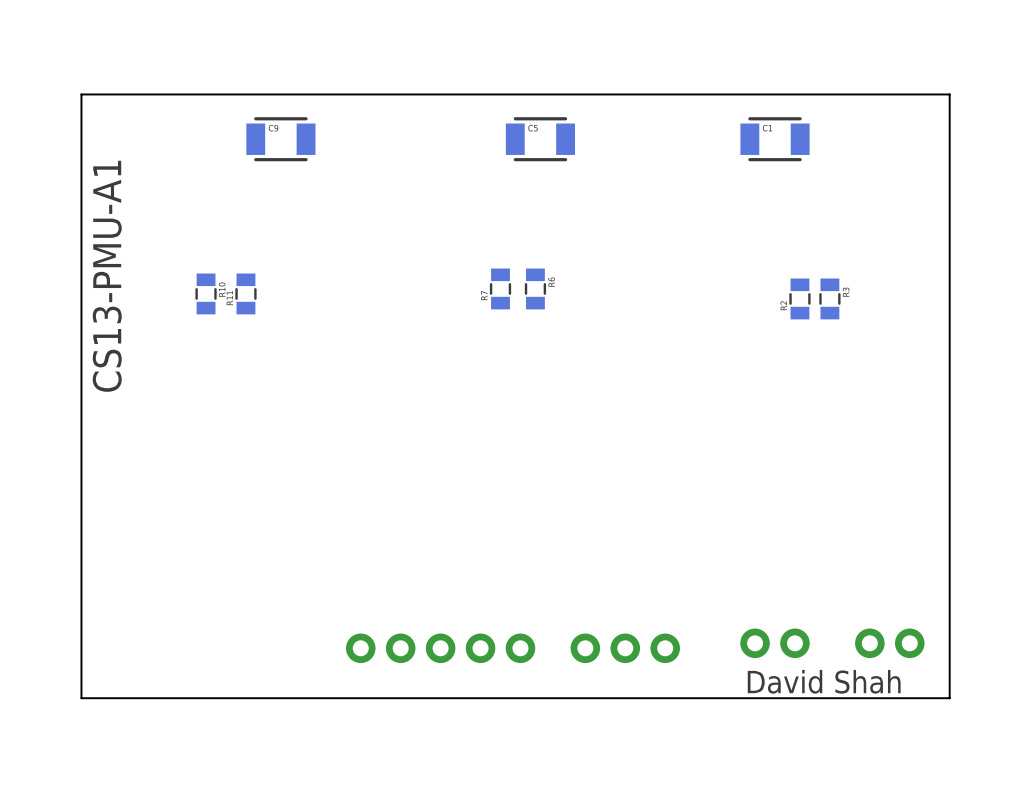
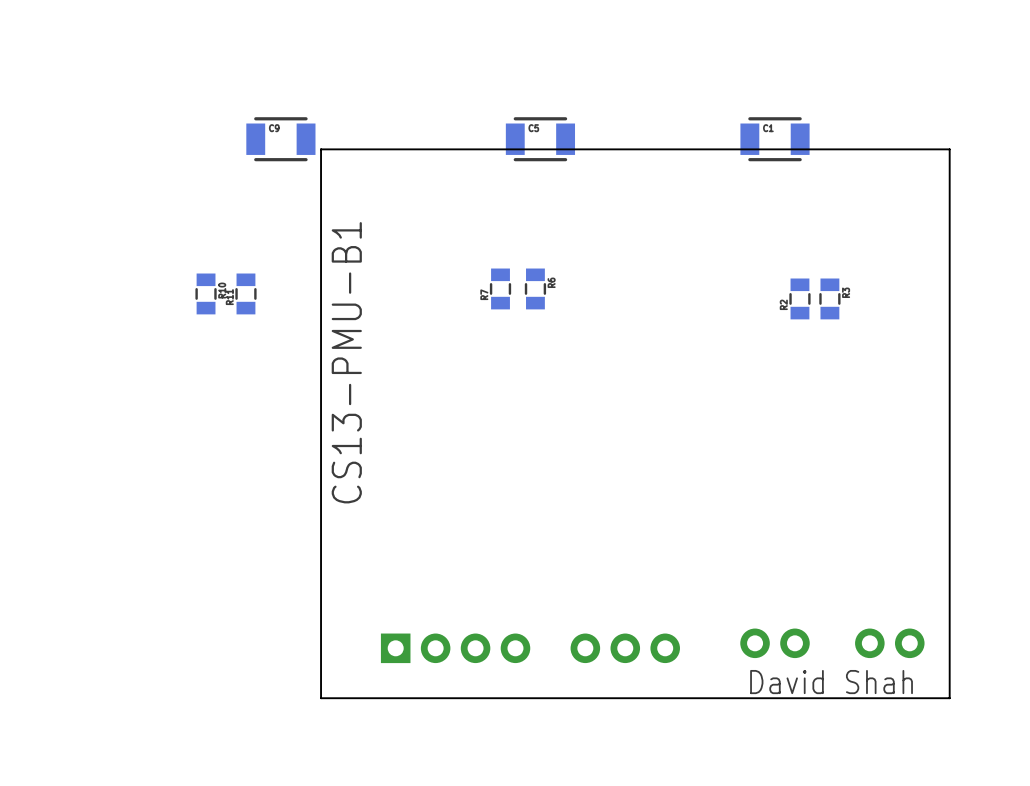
board edge: (949, 149) (949, 94) (81, 94) (81, 698) (321, 698) -> (949, 149) (321, 149) (321, 698)
text: CS13-PMU-A1 (107, 276) -> none
text: none -> CS13-PMU-B1 (346, 362)
part footprint: [345, 633, 536, 664] -> [380, 633, 531, 664]

